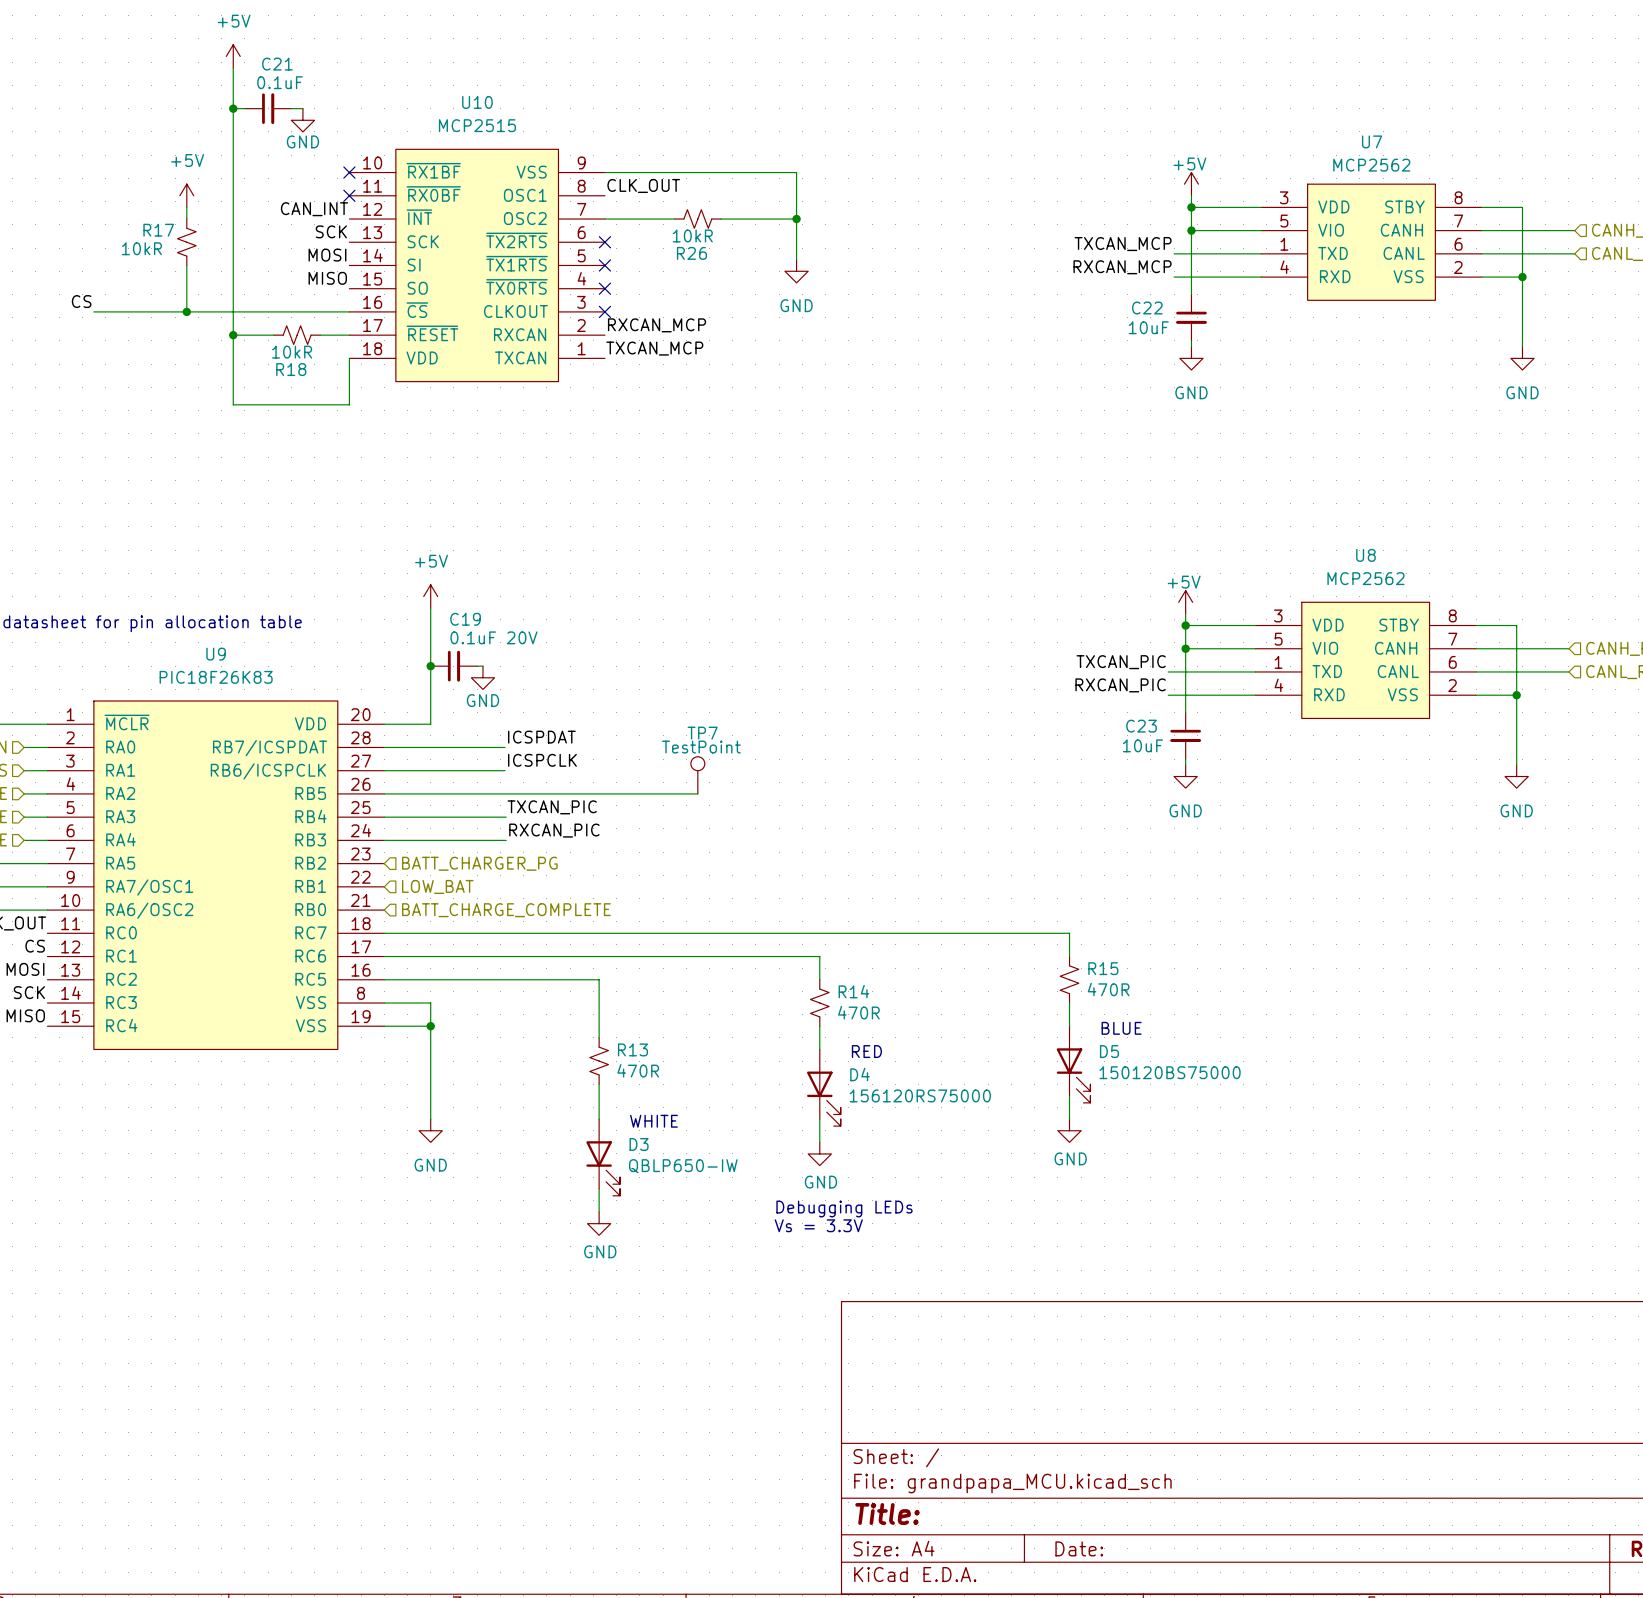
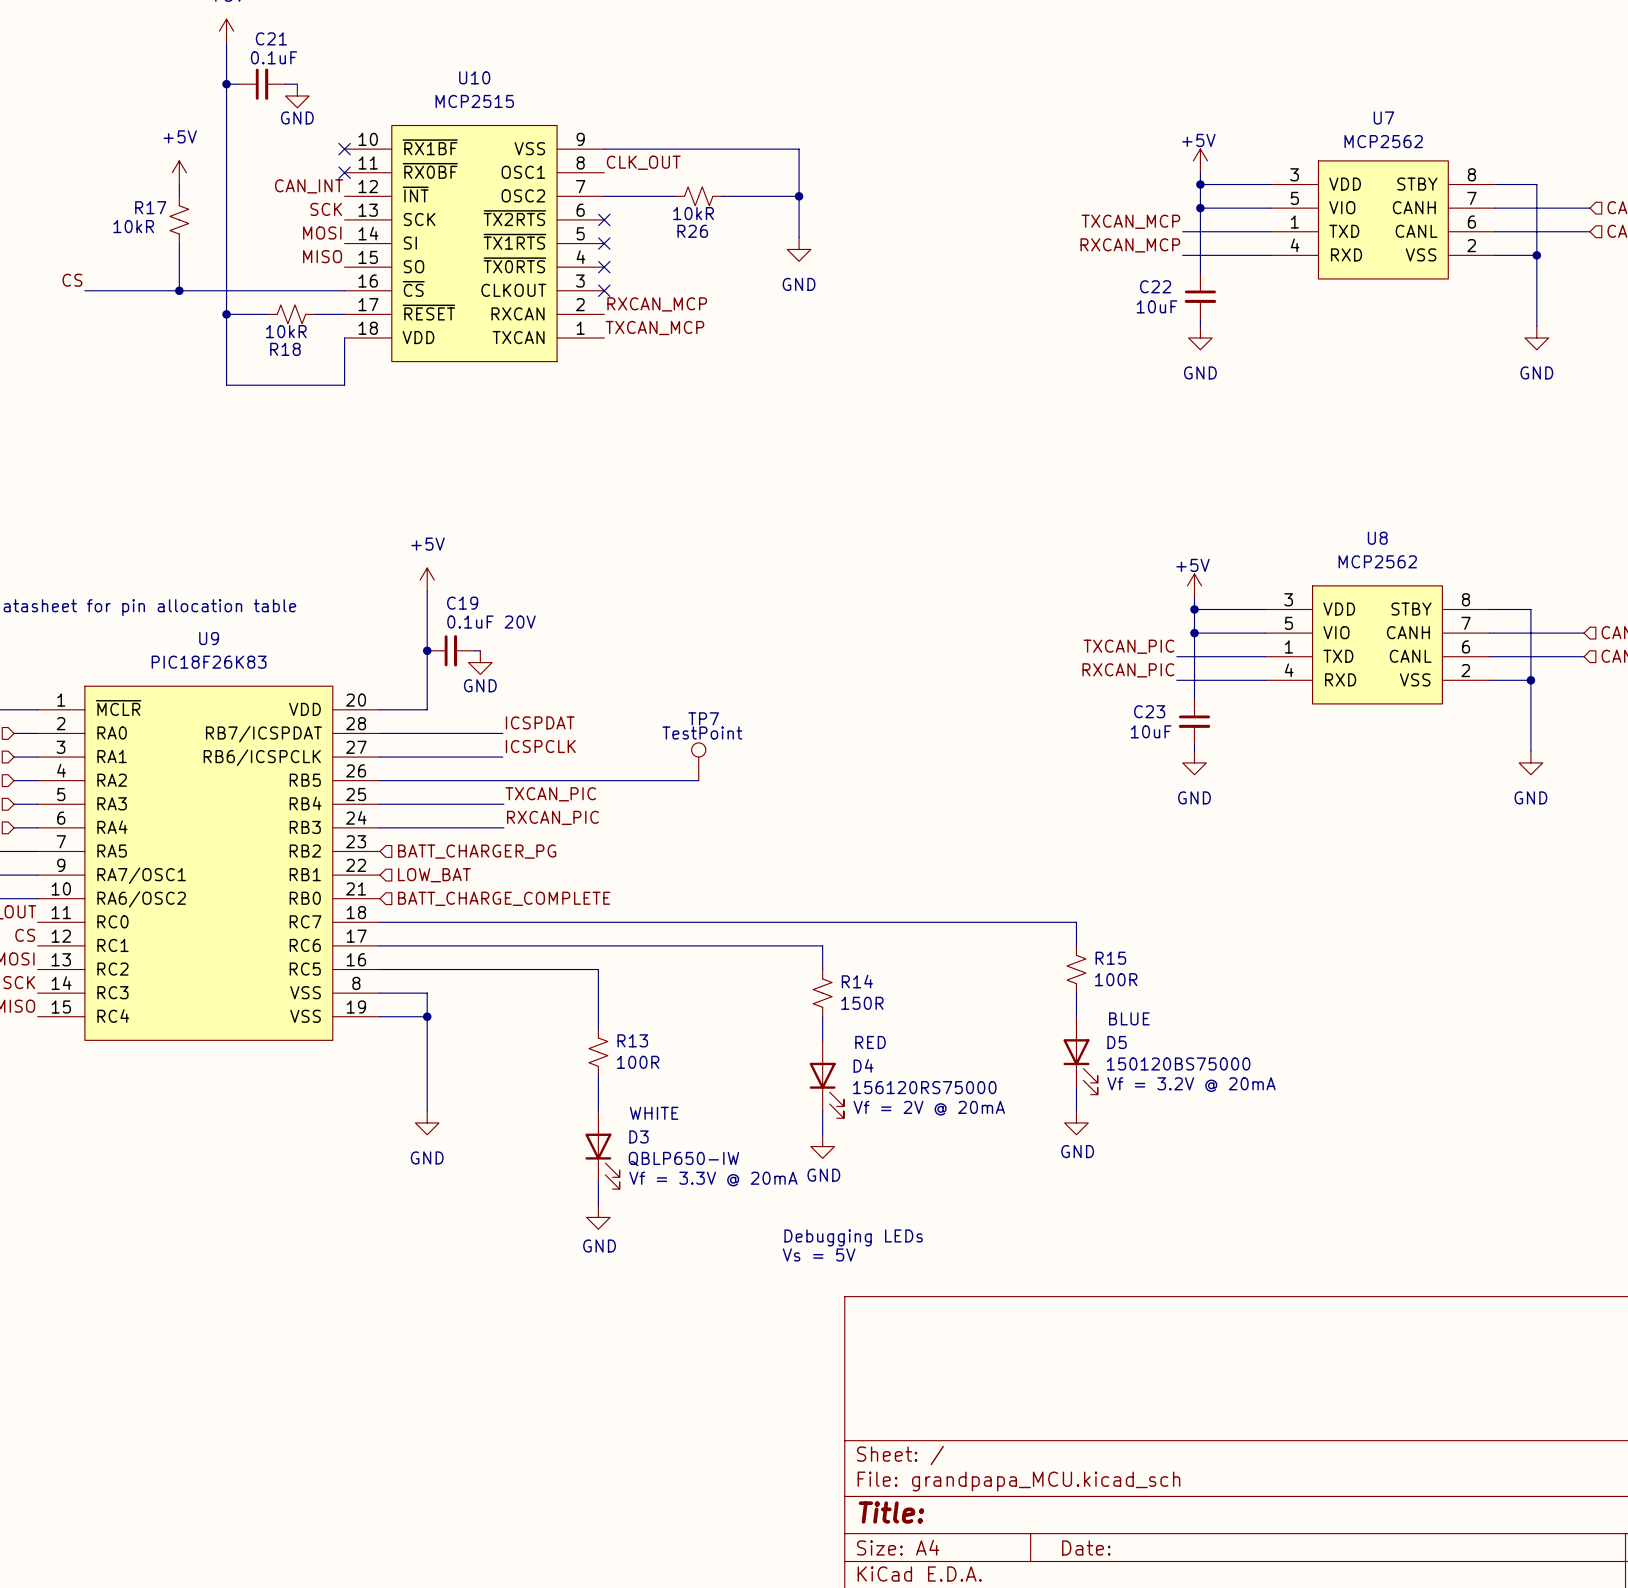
R15 value: 470R (1108, 989) -> 100R (1116, 979)
R14 value: 470R (858, 1012) -> 150R (862, 1003)
R13 value: 470R (638, 1070) -> 100R (638, 1062)
text: none -> Vf = 3.2V @ 20mA (1191, 1084)
text: none -> Vf = 2V @ 20mA (929, 1108)
text: none -> Vf = 3.3V @ 20mA (713, 1179)
text position: Debugging LEDs (844, 1209) -> Debugging LEDs (853, 1237)
text: Vs = 3.3V (818, 1225) -> none
text: none -> Vs = 5V (819, 1254)

